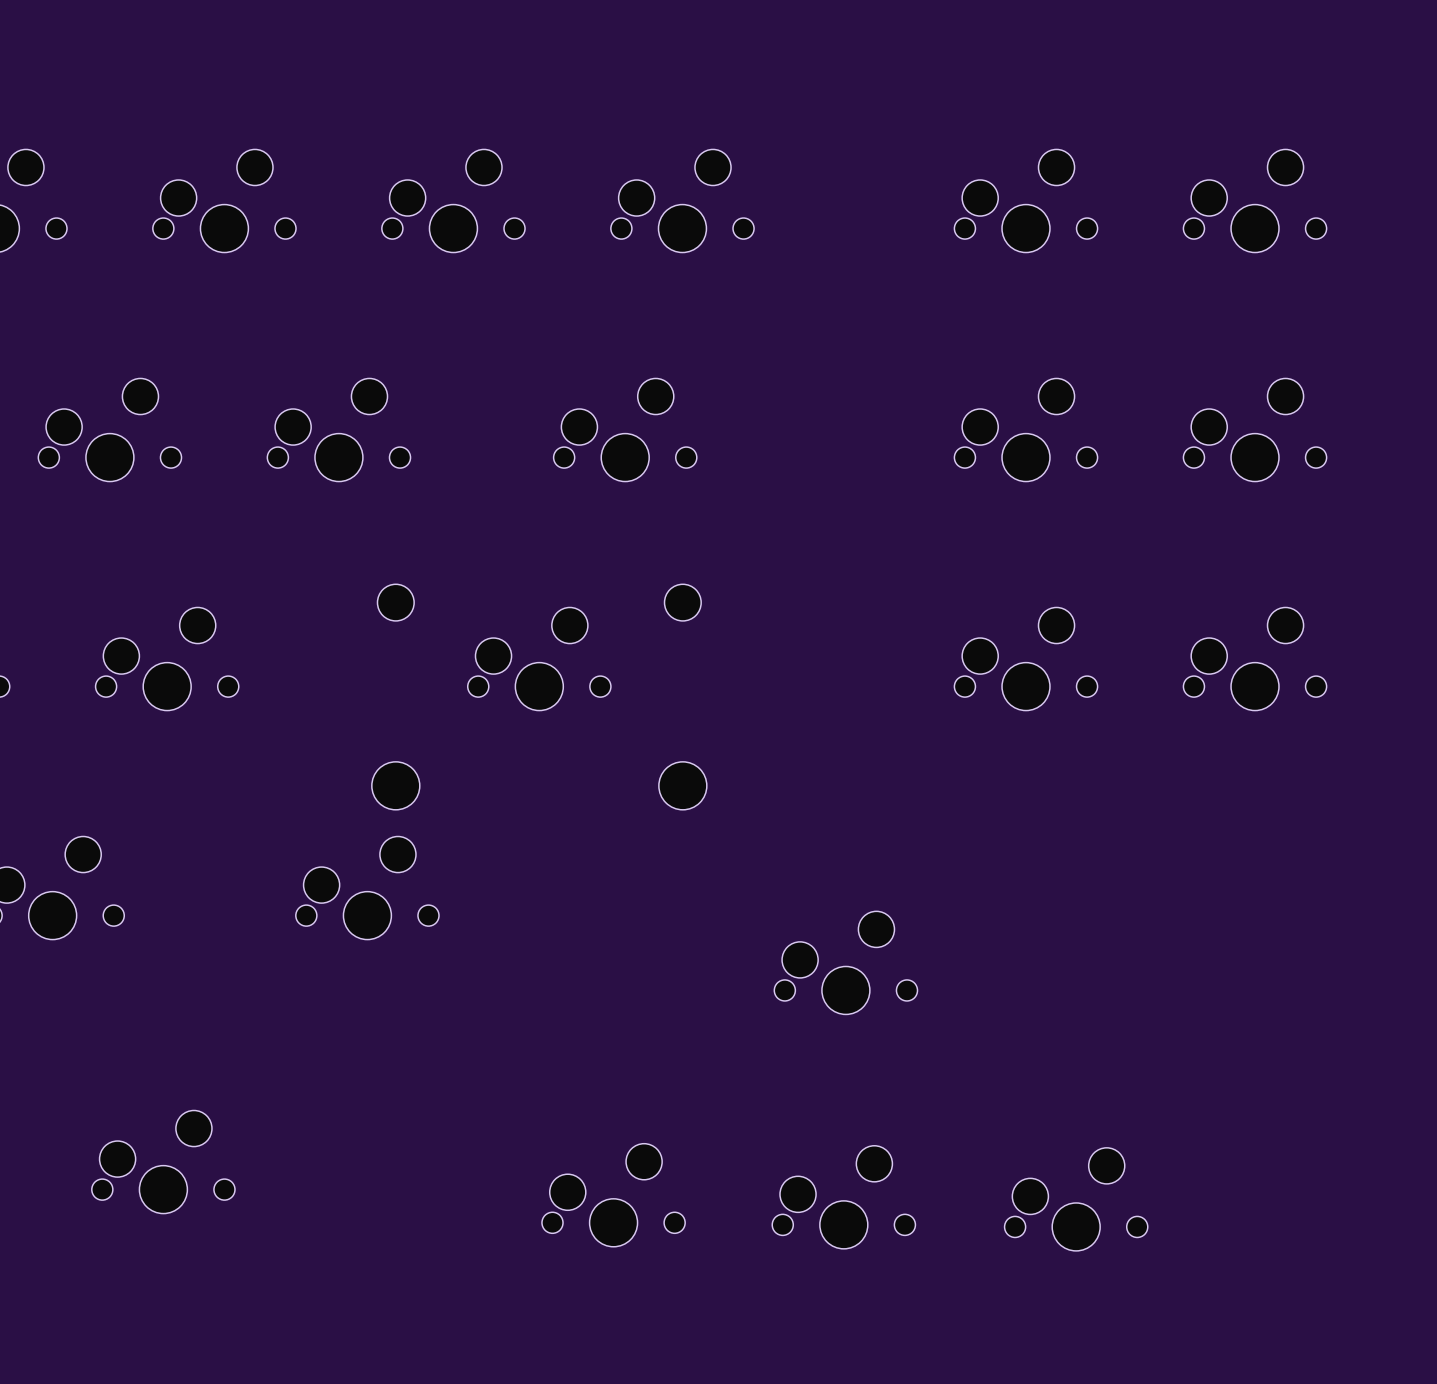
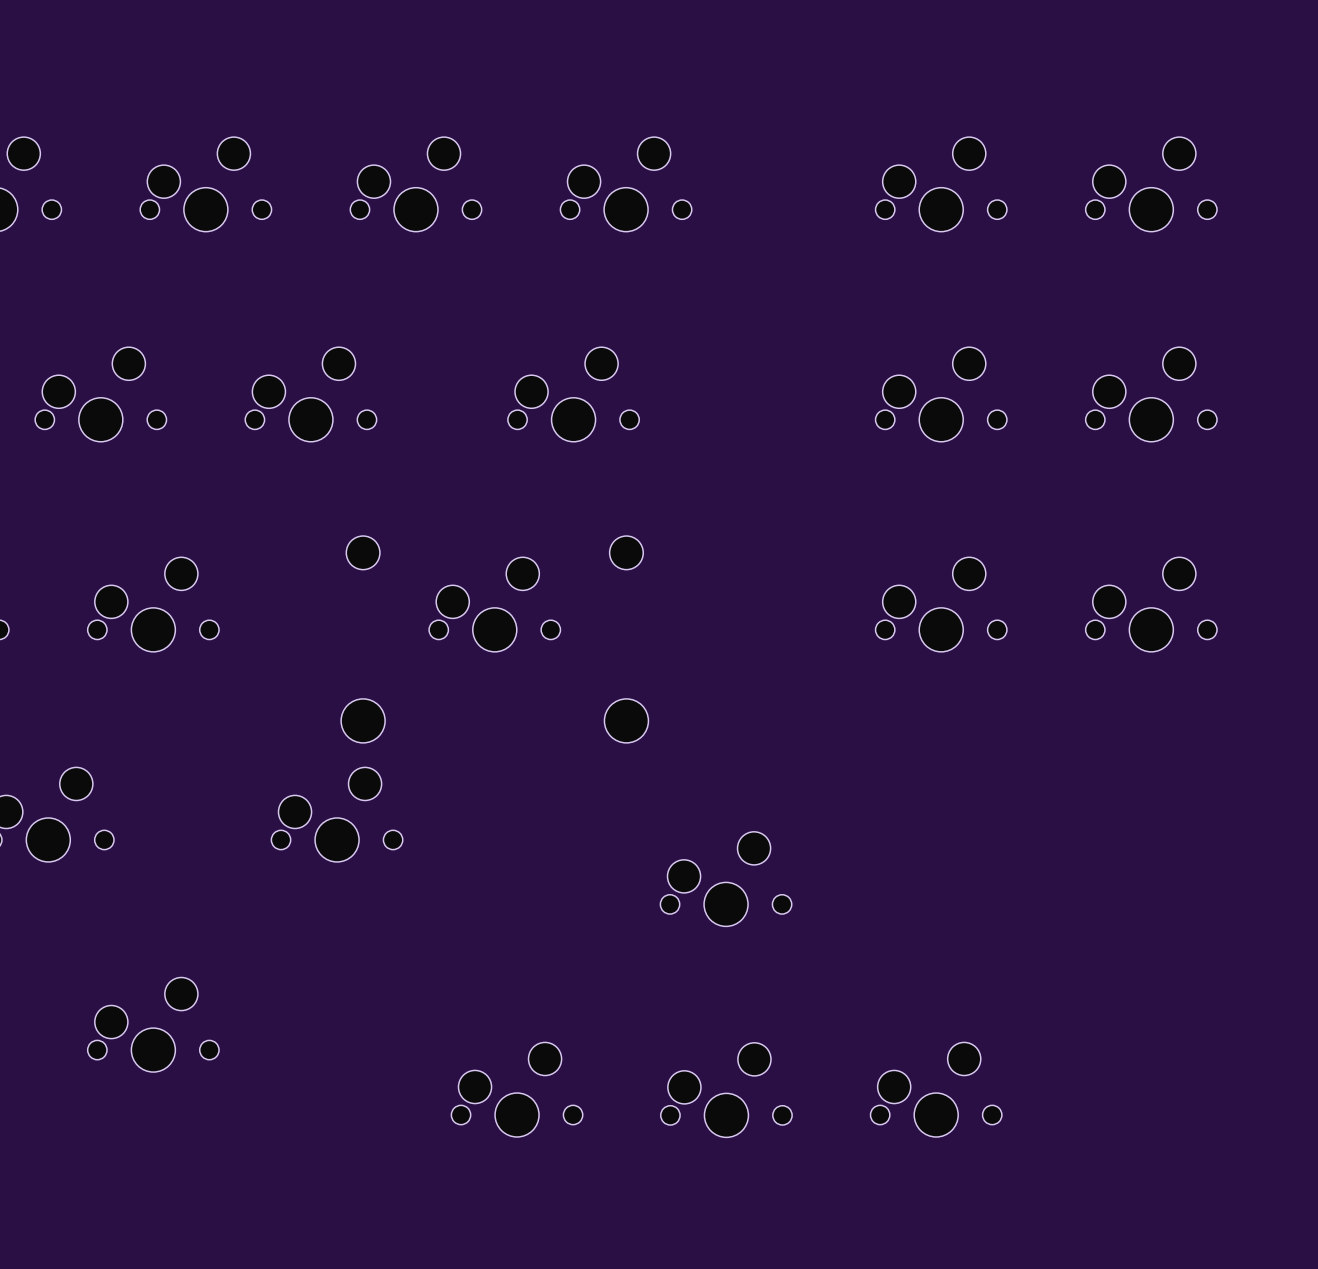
part position: (845, 962) -> (726, 879)
part position: (163, 1162) -> (153, 1024)
part position: (613, 1195) -> (517, 1089)
part position: (843, 1197) -> (726, 1090)
part position: (1076, 1199) -> (936, 1089)

